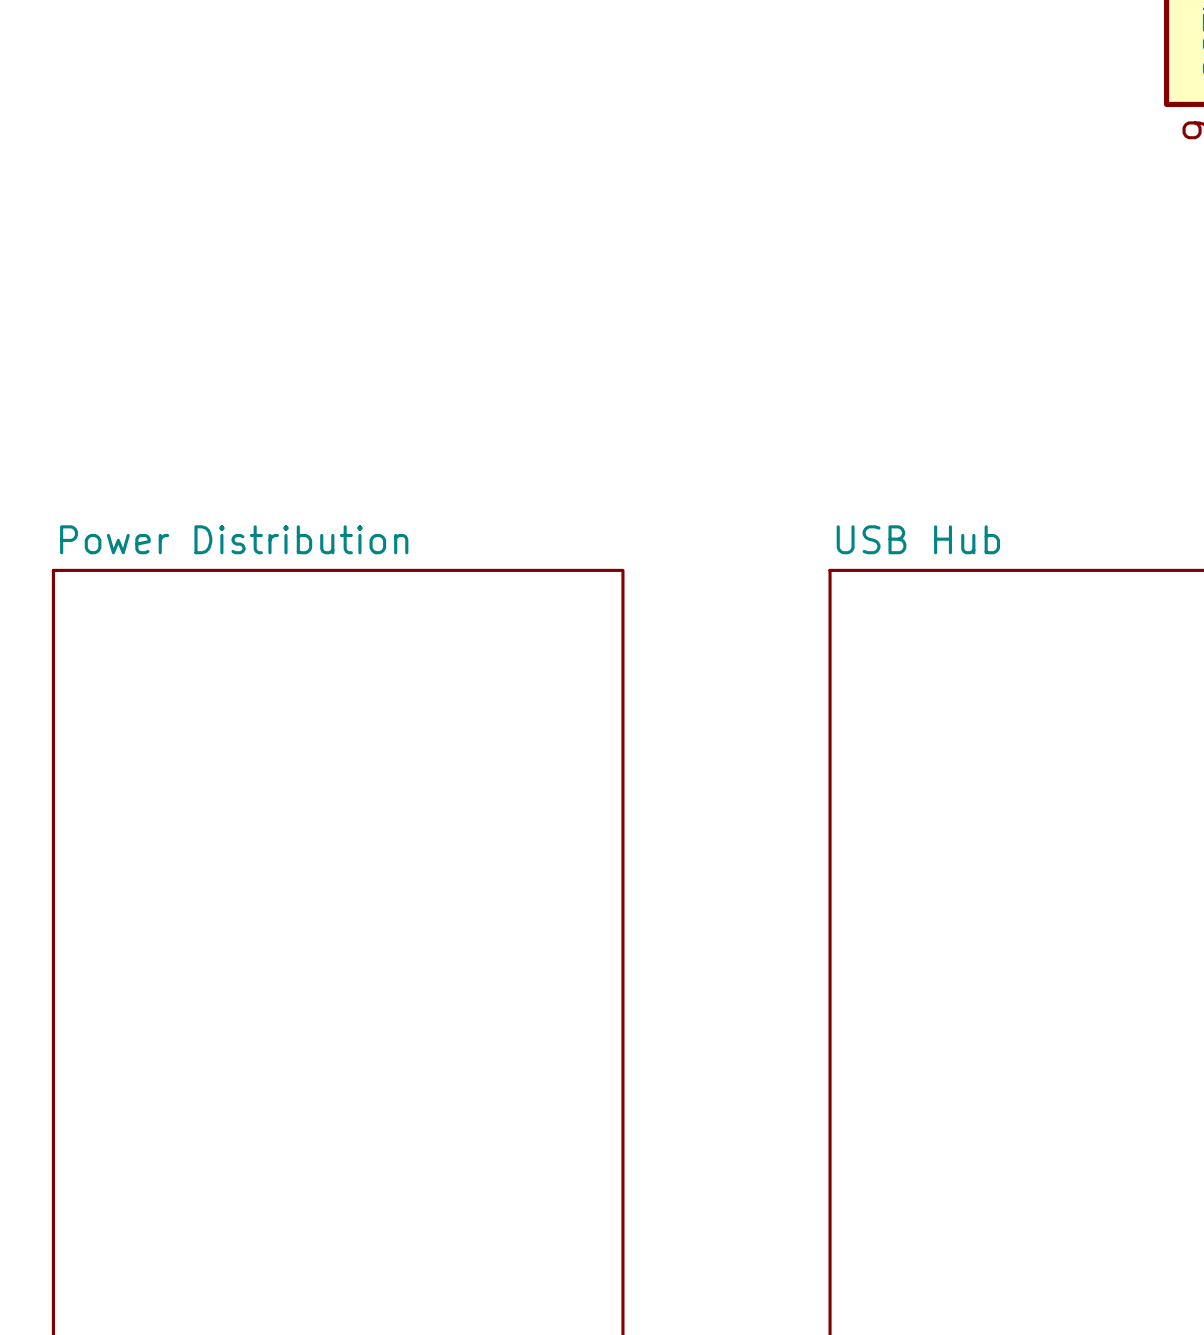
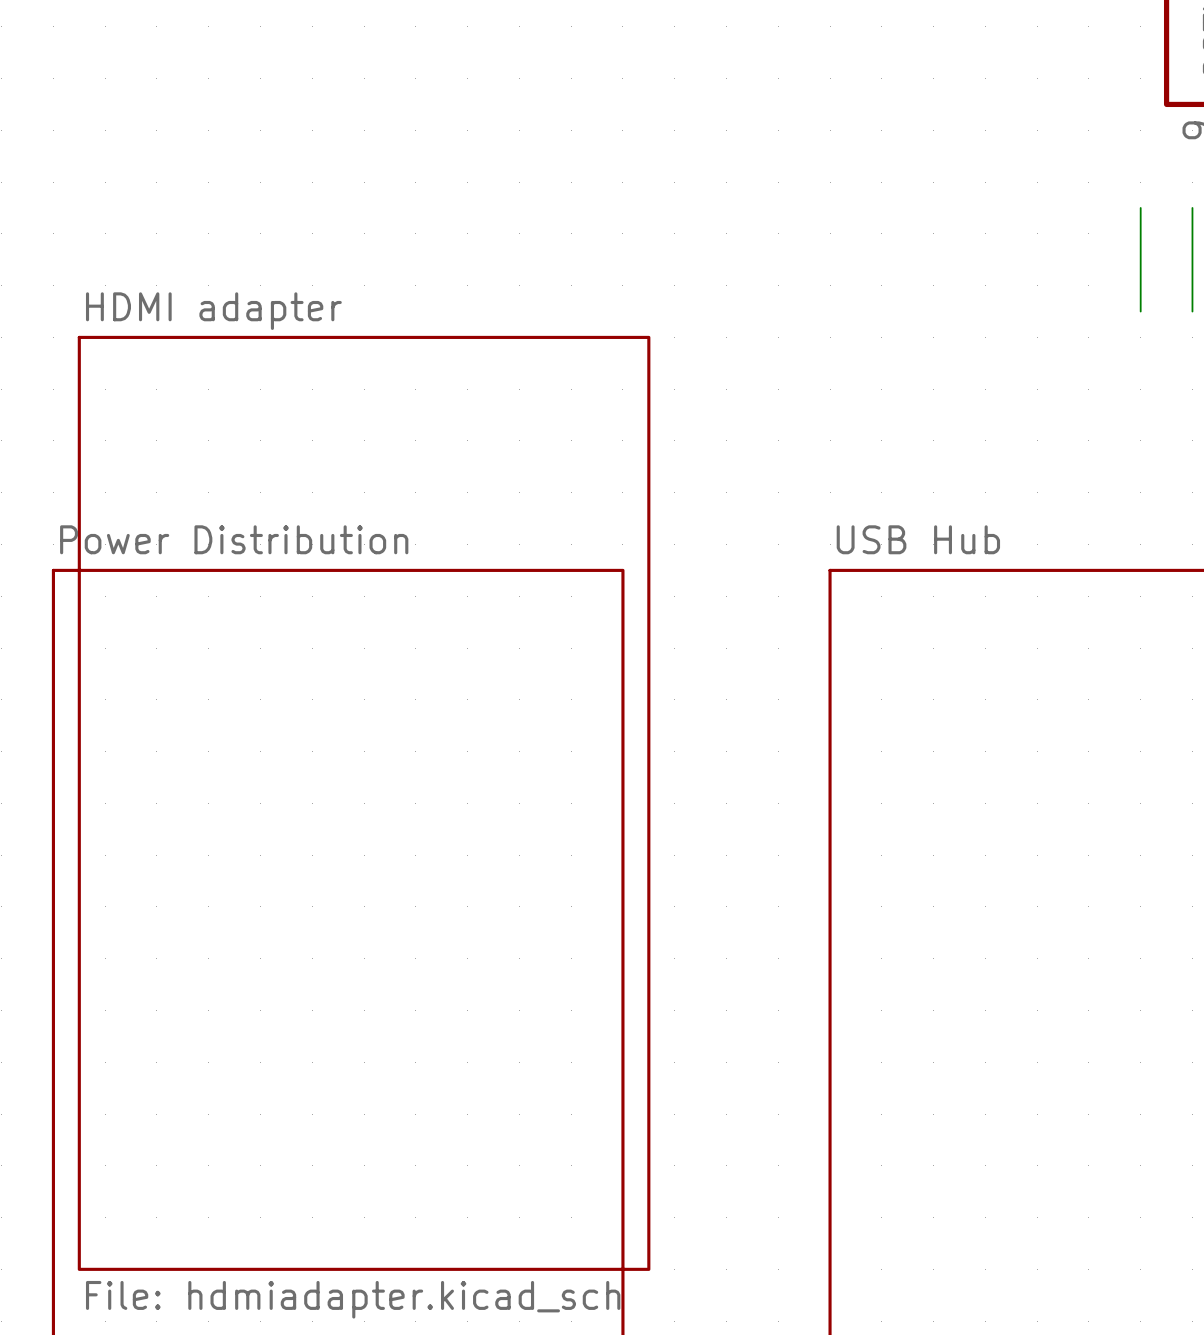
wire: none -> (1140, 207) (1140, 311)
wire: none -> (1192, 207) (1192, 311)
sheet HDMI adapter: none -> File: hdmiadapter.kicad_sch (364, 803)

